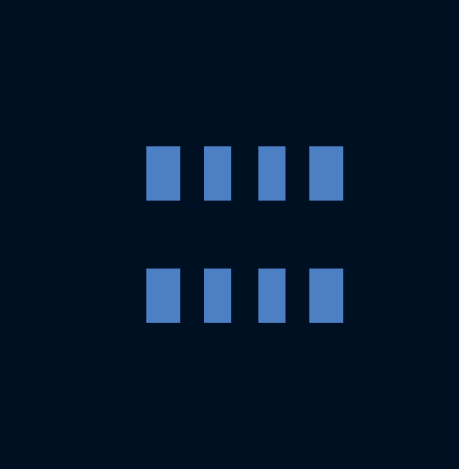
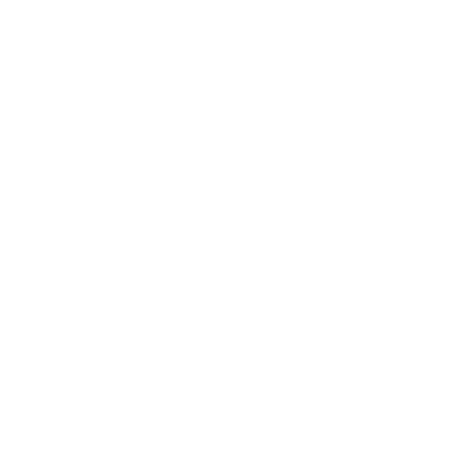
part: (244, 234) -> none

